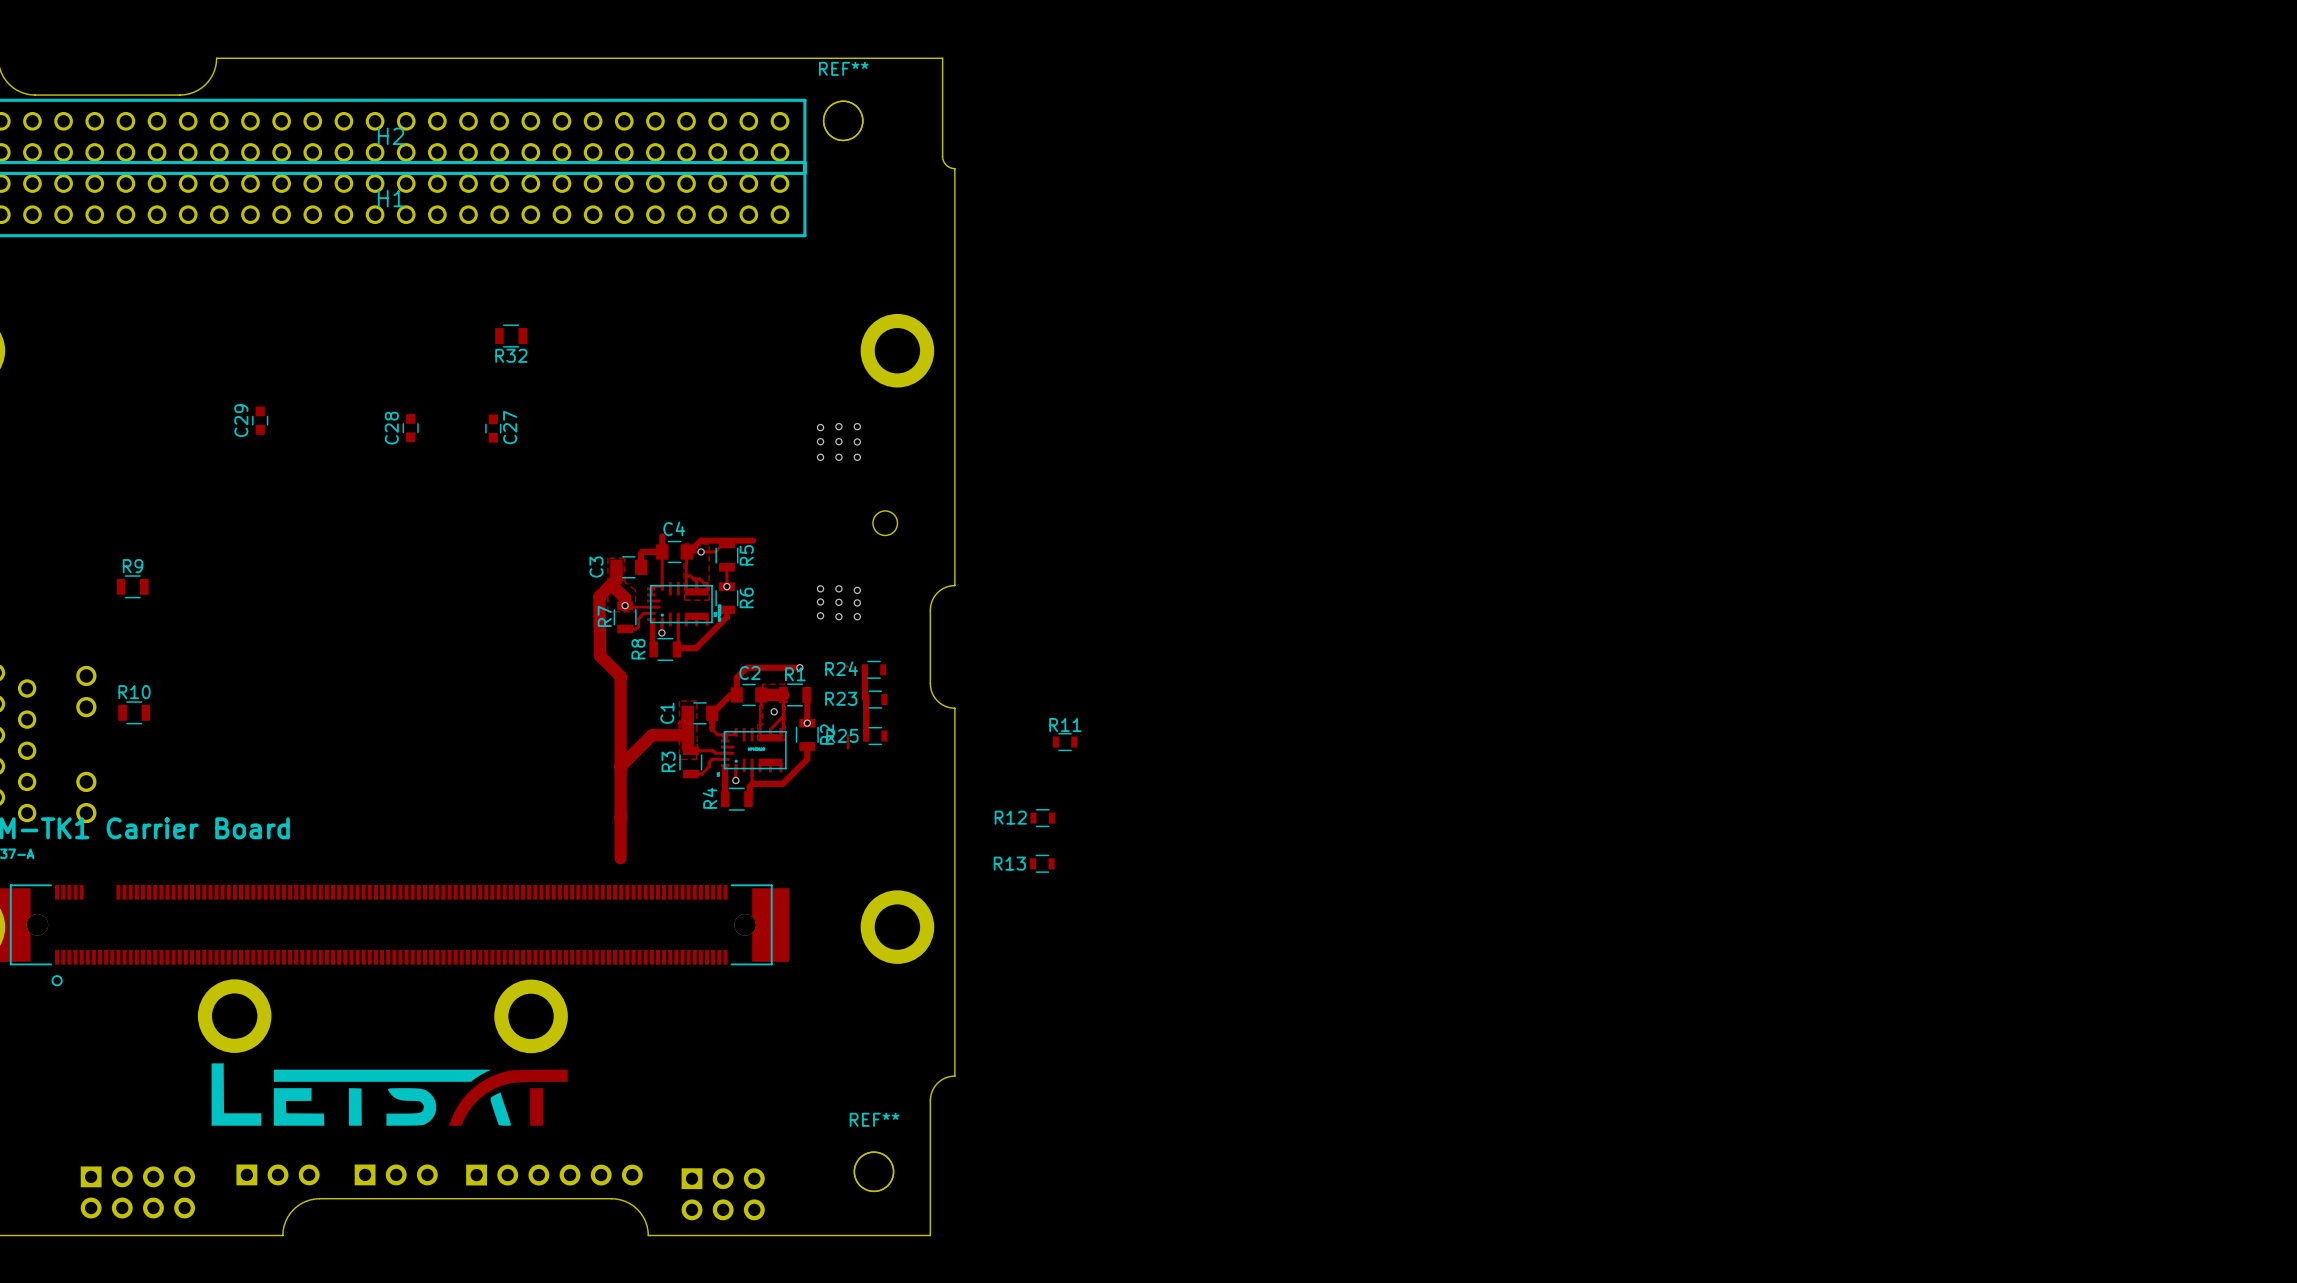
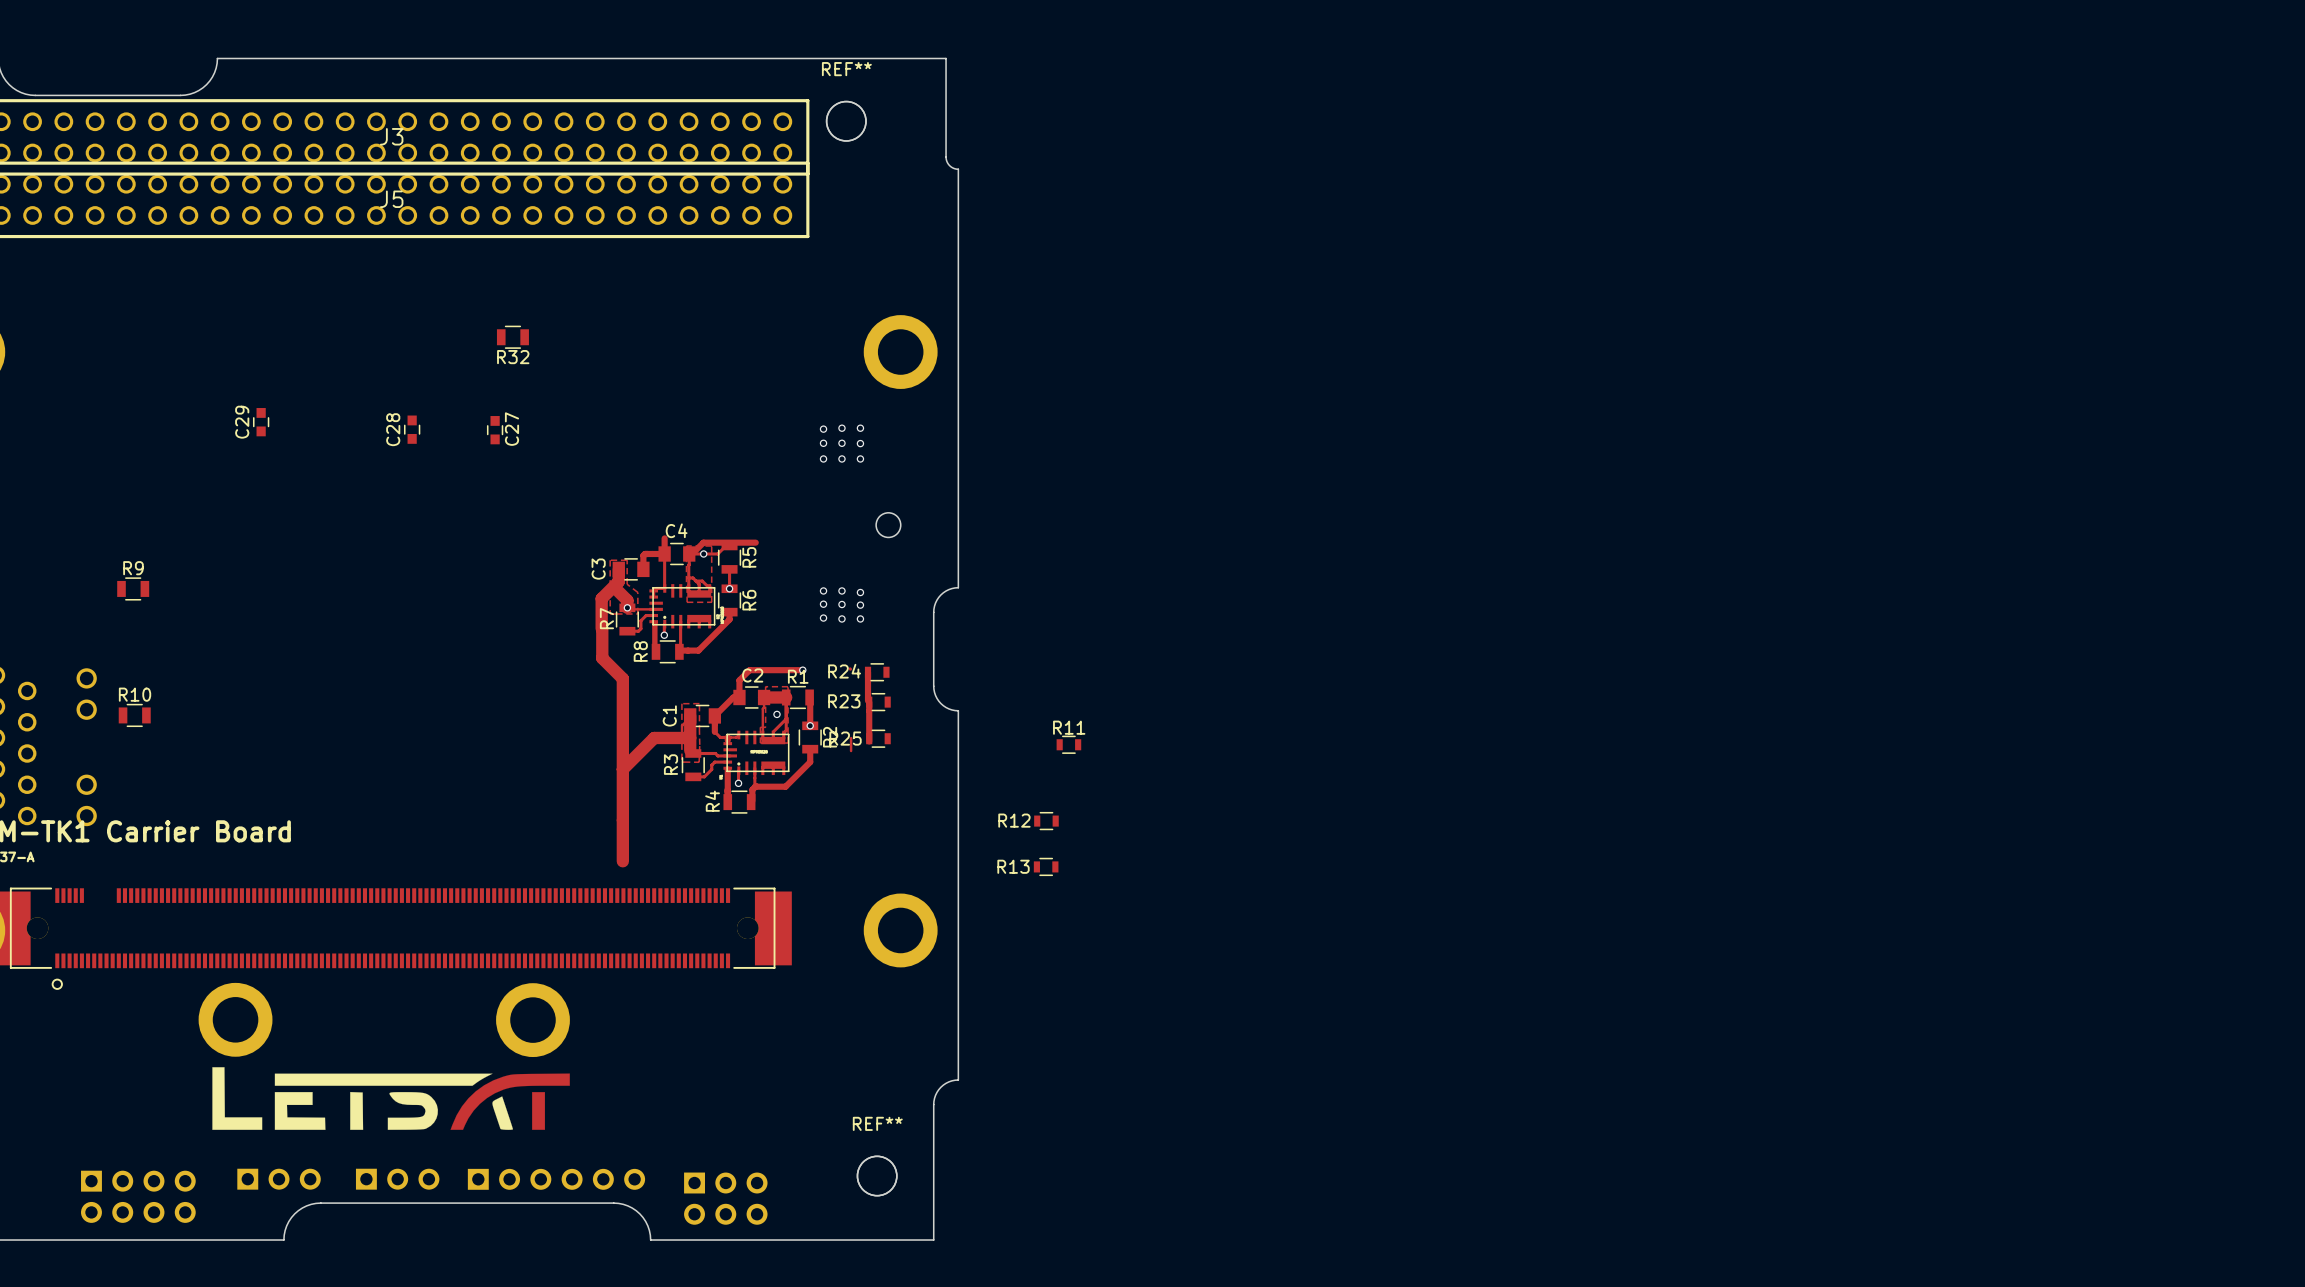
H2 name: H2 (391, 136) -> J3 (391, 136)
H1 name: H1 (391, 198) -> J5 (391, 199)

